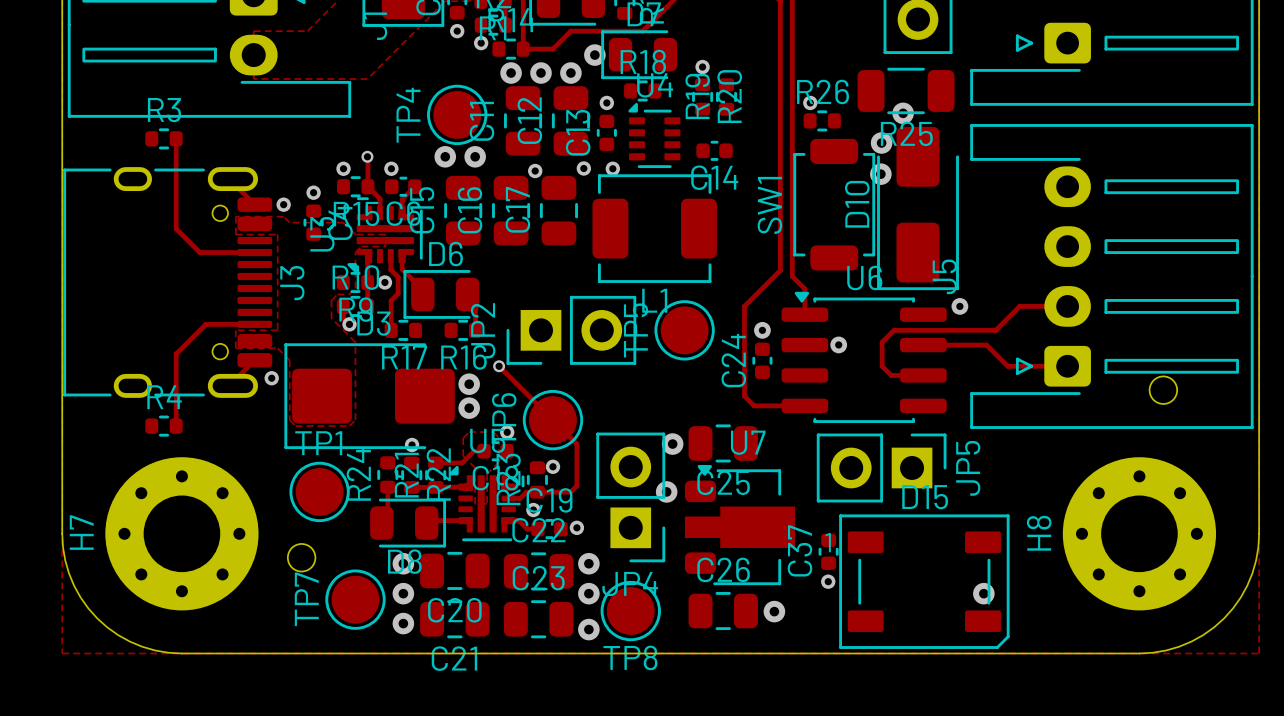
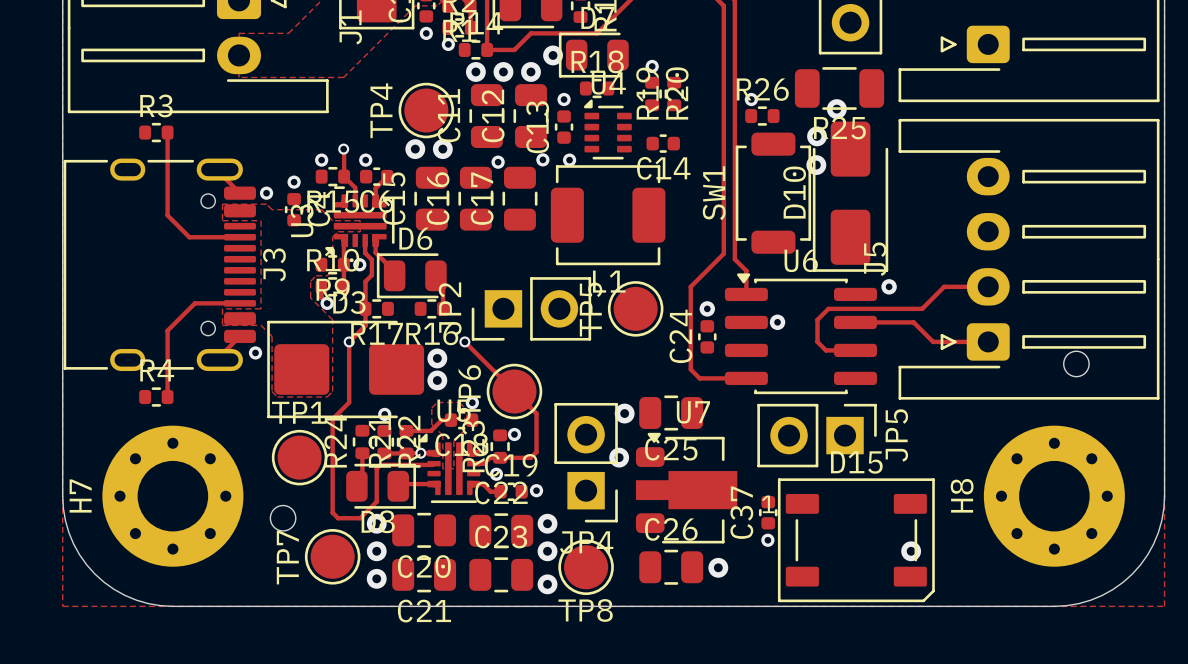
track: none -> (365, 308) (365, 325) (349, 341) (349, 402) (332, 419) (332, 512) (338, 518) (360, 518) (376, 501) (376, 468) (380, 464) (434, 463)
via: none -> (349, 341)
via: none -> (420, 453)

